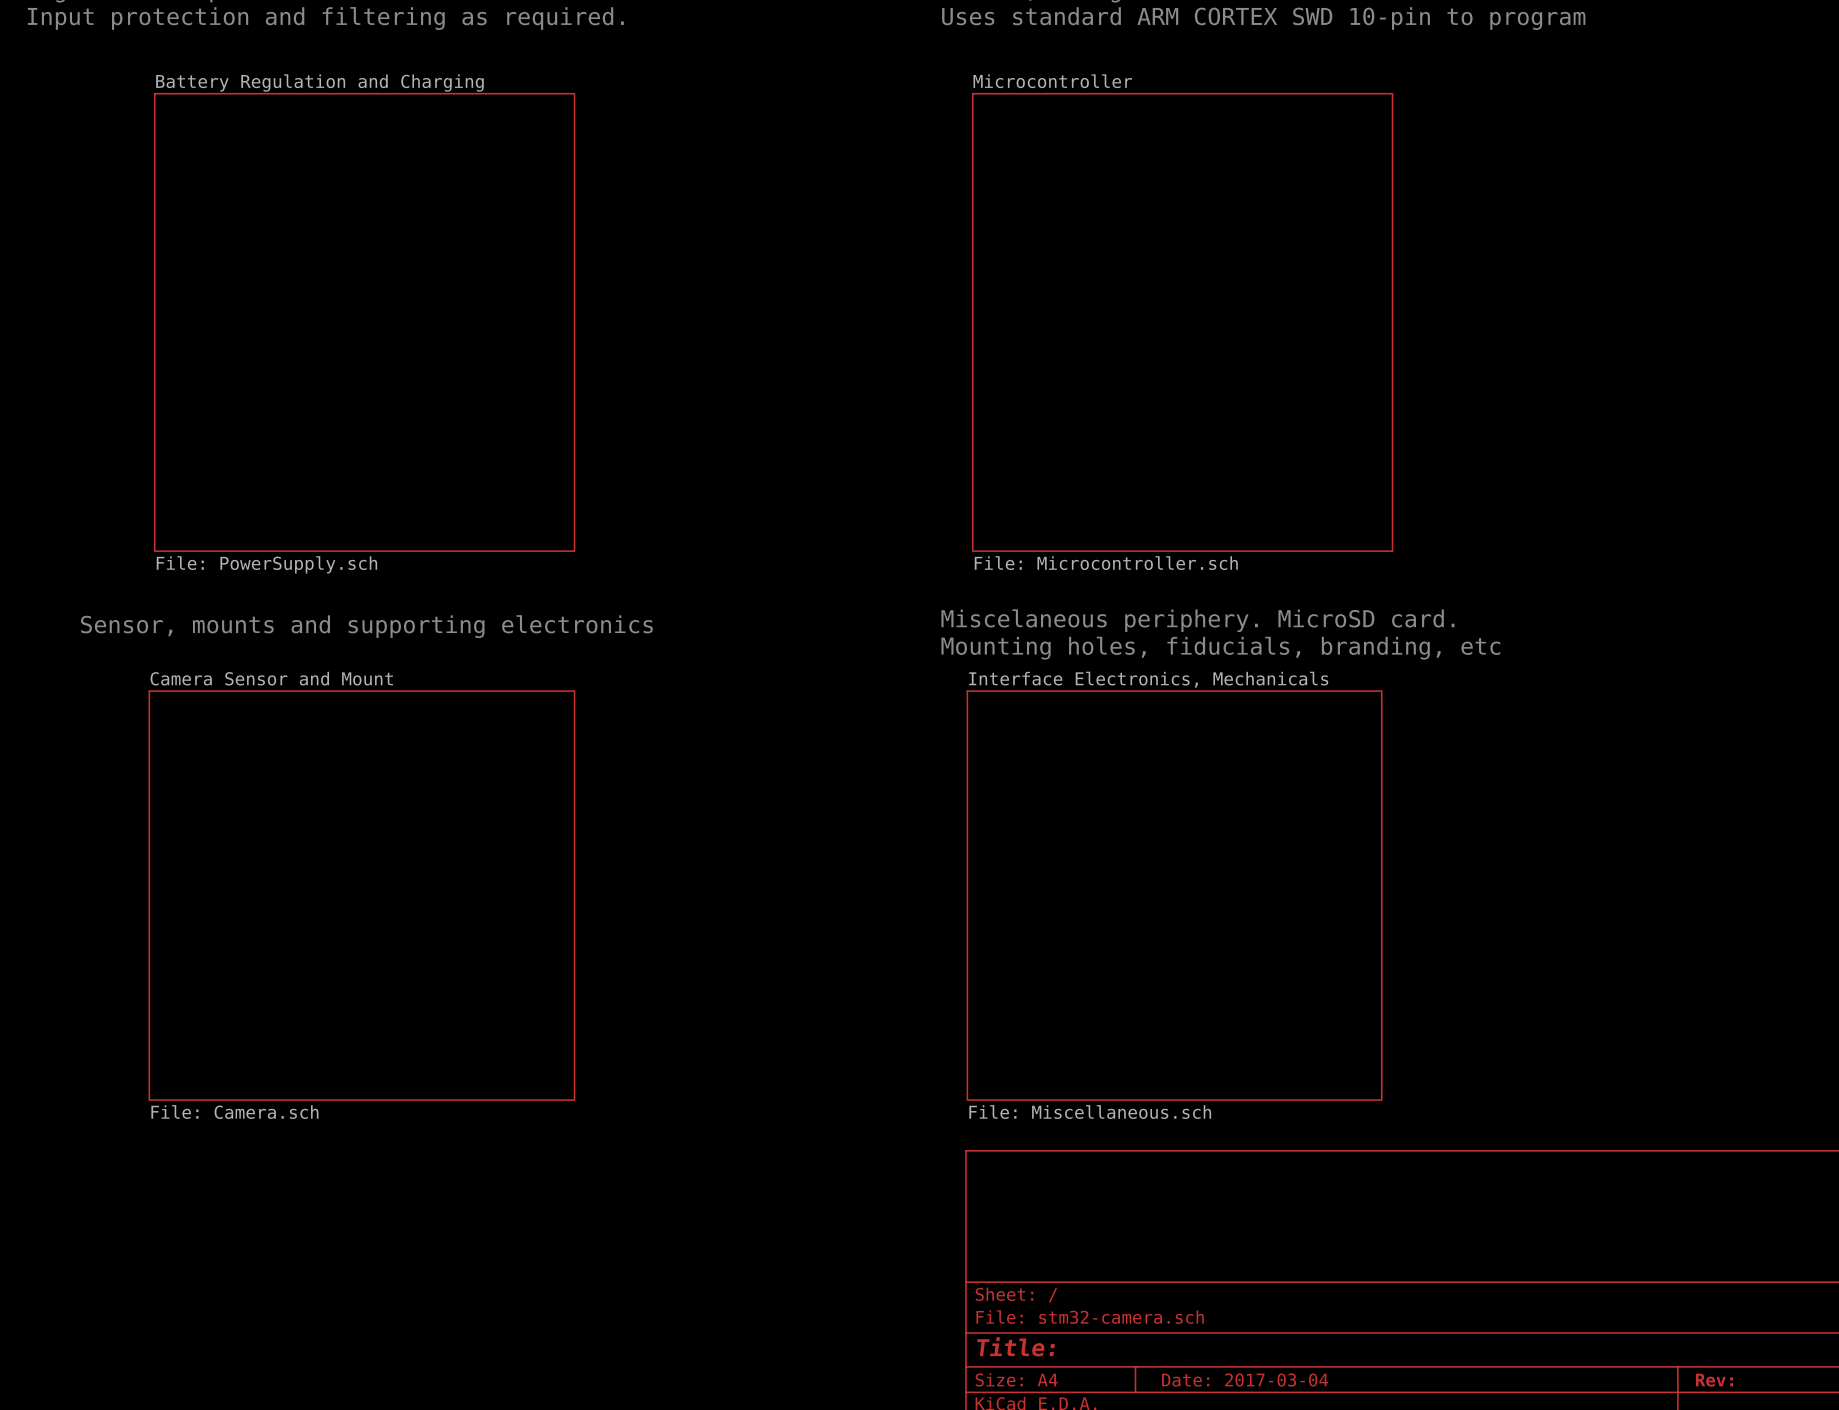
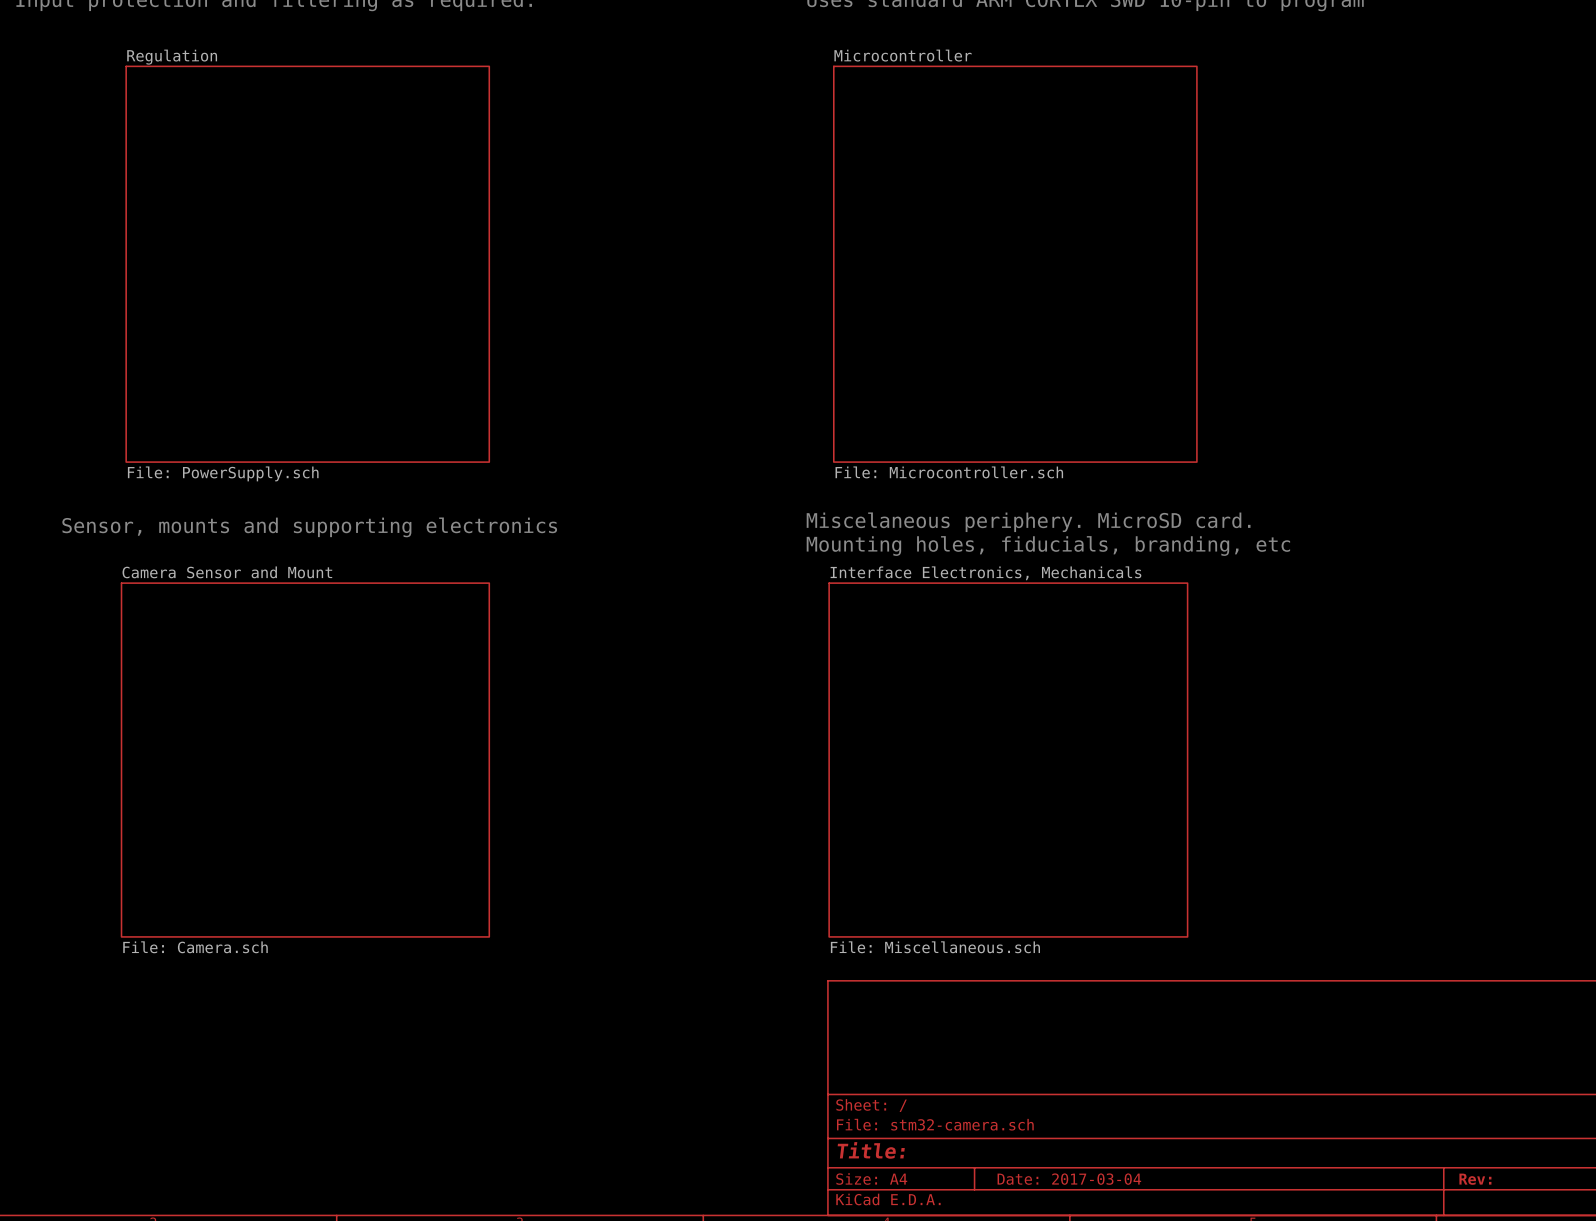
sheet Battery Regulation and Charging name: Battery Regulation and Charging (319, 83) -> Regulation (172, 57)

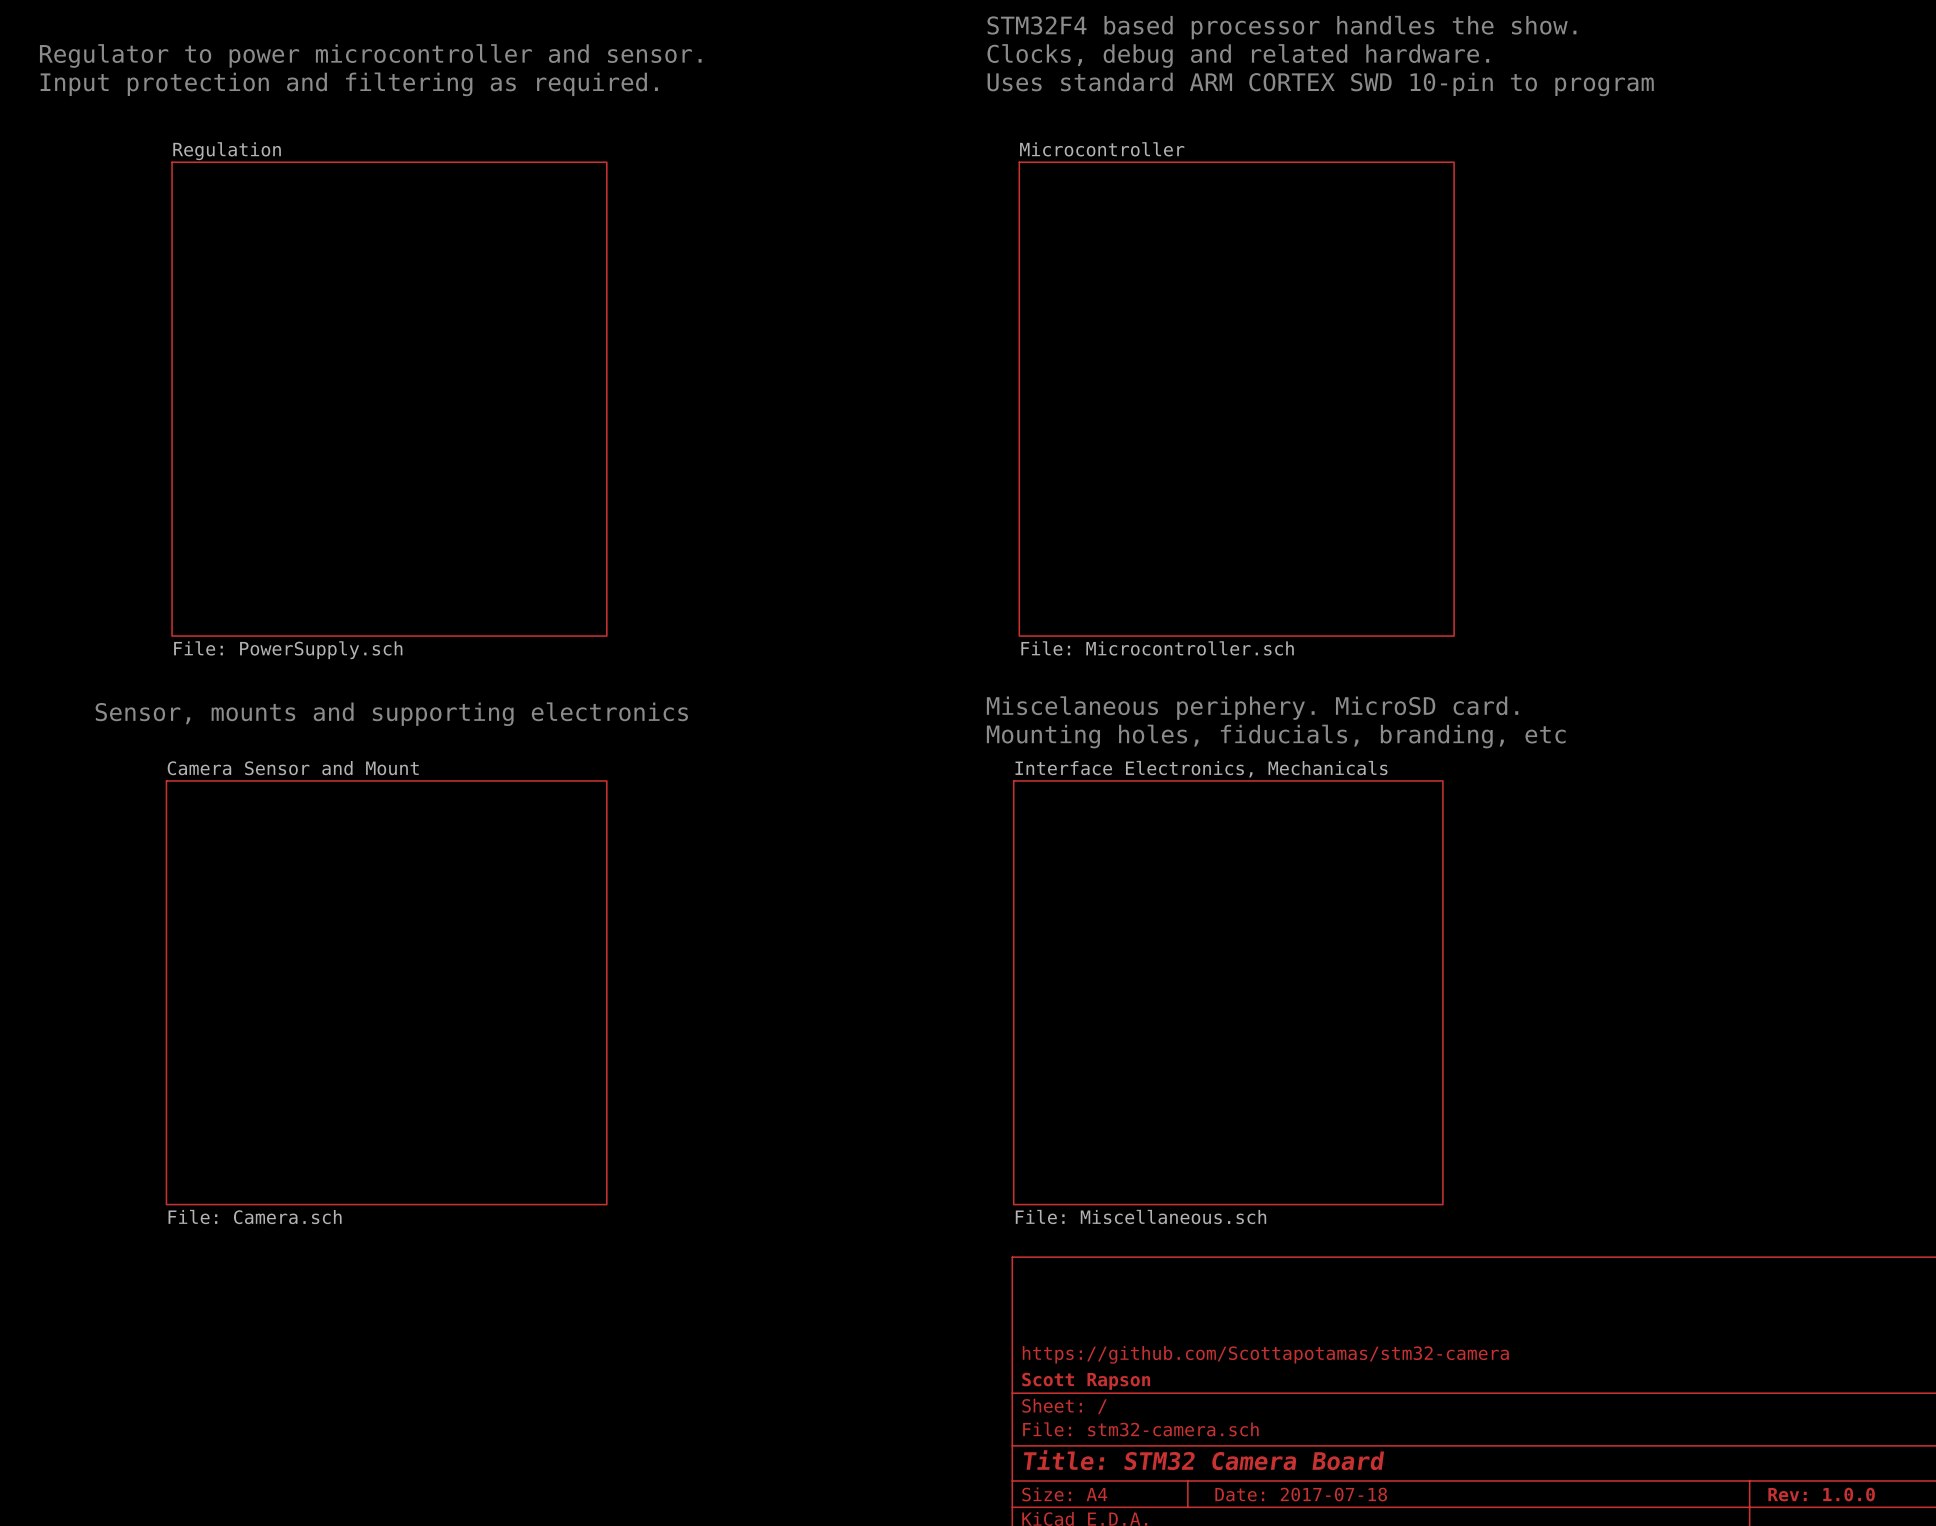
title block: none -> https://github.com/Scottapotamas/stm32-camera (1265, 1354)
title block: none -> Scott Rapson (1086, 1381)
title block: Title: (871, 1150) -> Title: STM32 Camera Board (1203, 1460)
title block: Date: 2017-03-04 (1069, 1179) -> Date: 2017-07-18 (1301, 1494)
title block: Rev: (1475, 1179) -> Rev: 1.0.0 (1821, 1494)

